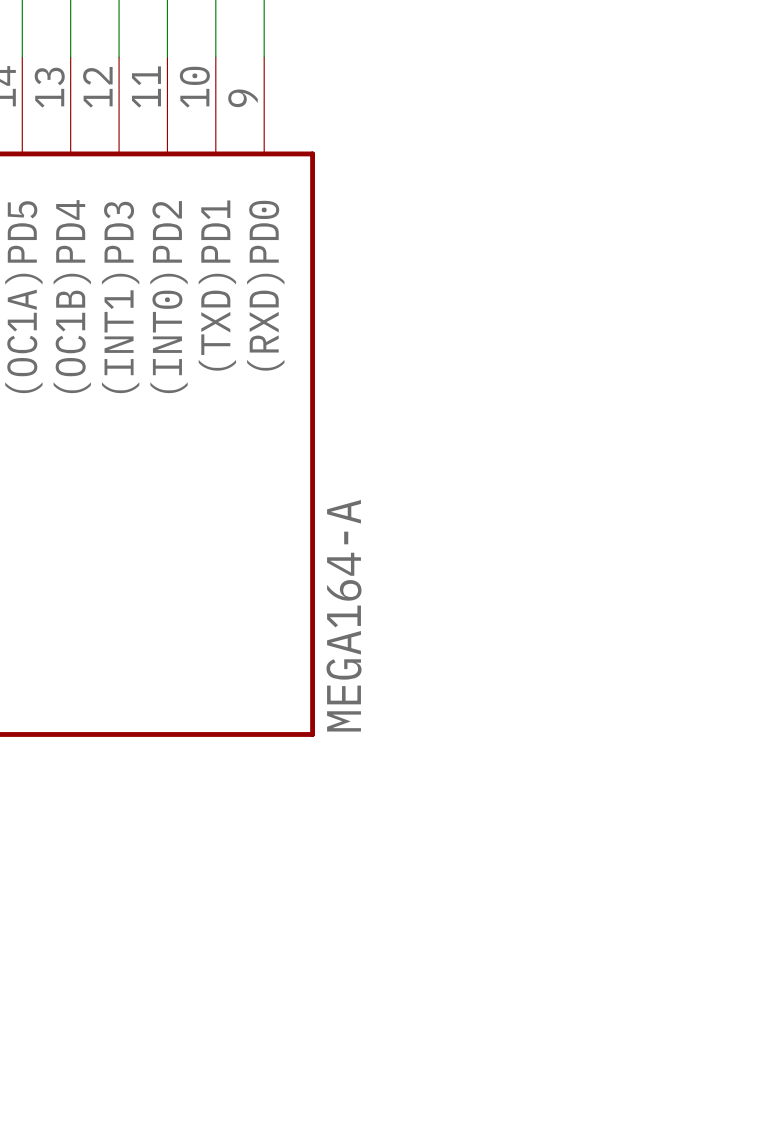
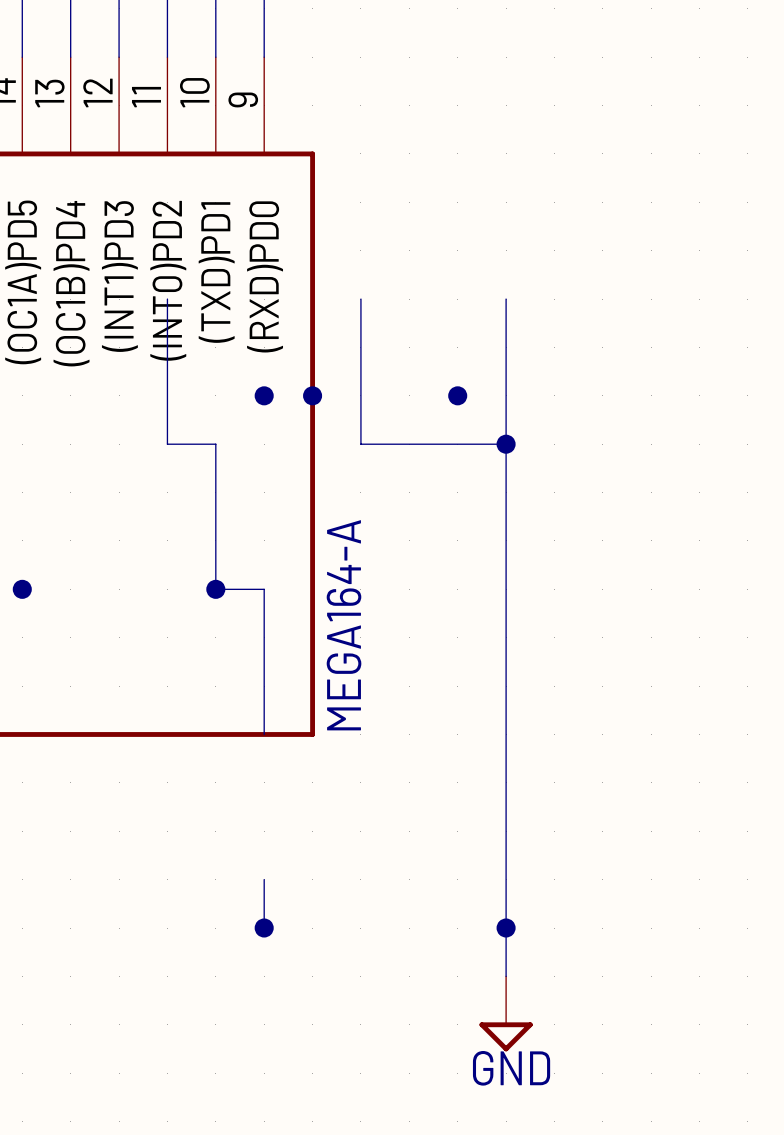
wire: none -> (167, 299) (167, 444) (215, 444) (215, 589) (264, 589) (264, 734)
wire: none -> (360, 299) (360, 444) (506, 444)
wire: none -> (506, 299) (506, 976)
junction: none -> (264, 395)
junction: none -> (312, 395)
junction: none -> (457, 395)
junction: none -> (506, 444)
junction: none -> (22, 589)
junction: none -> (215, 589)
wire: none -> (264, 879) (264, 928)
junction: none -> (264, 928)
junction: none -> (506, 928)
power symbol: none -> GND (506, 1013)

